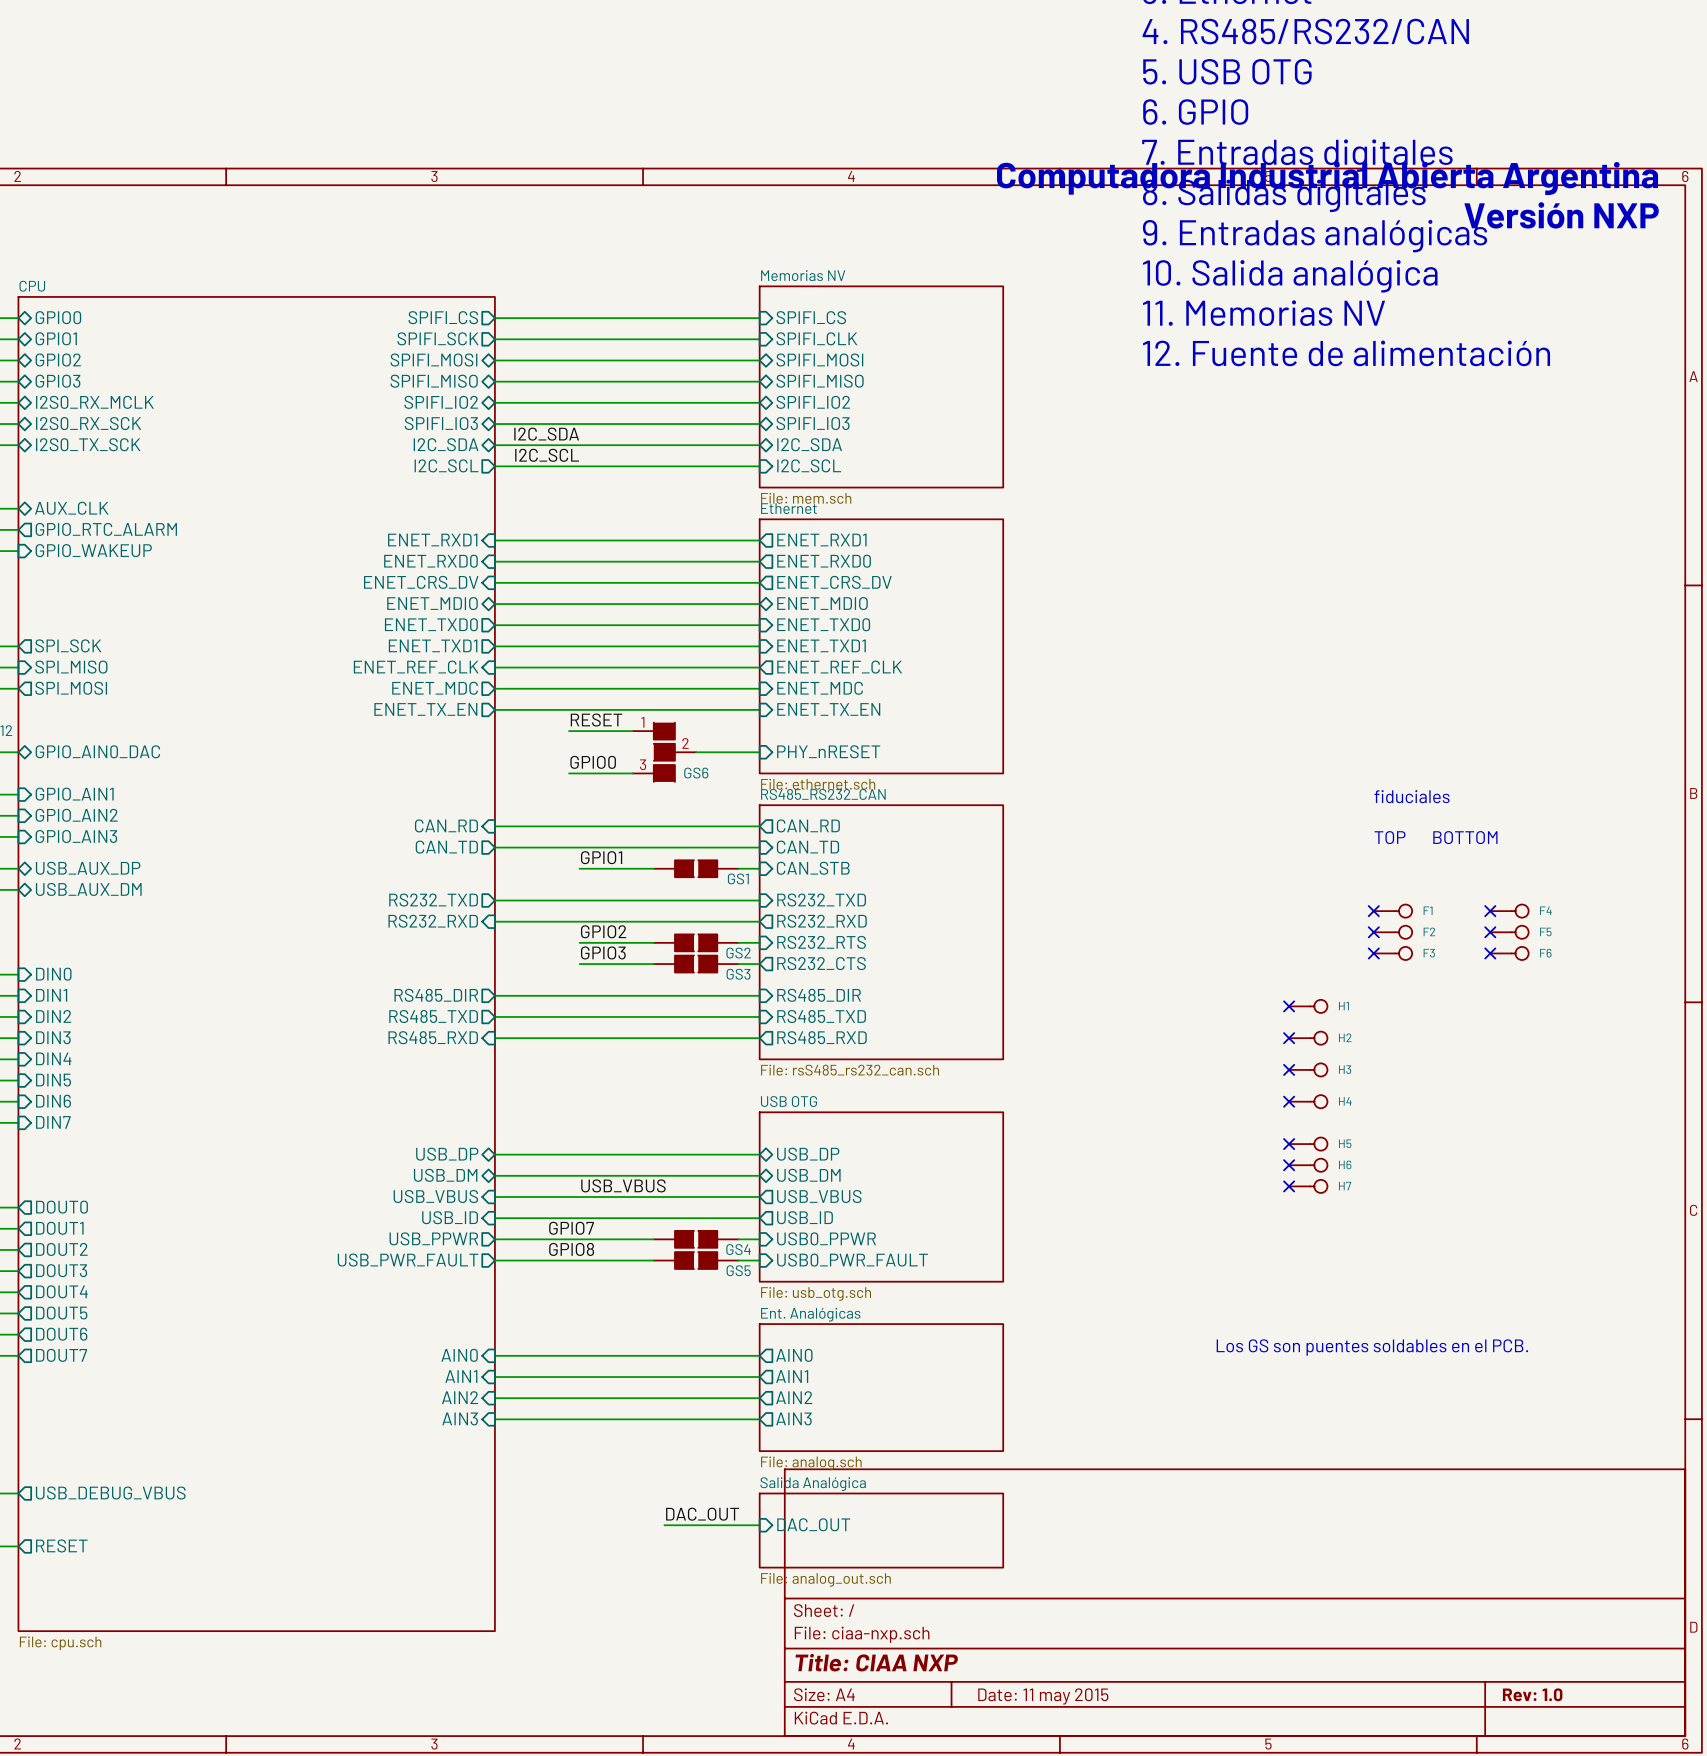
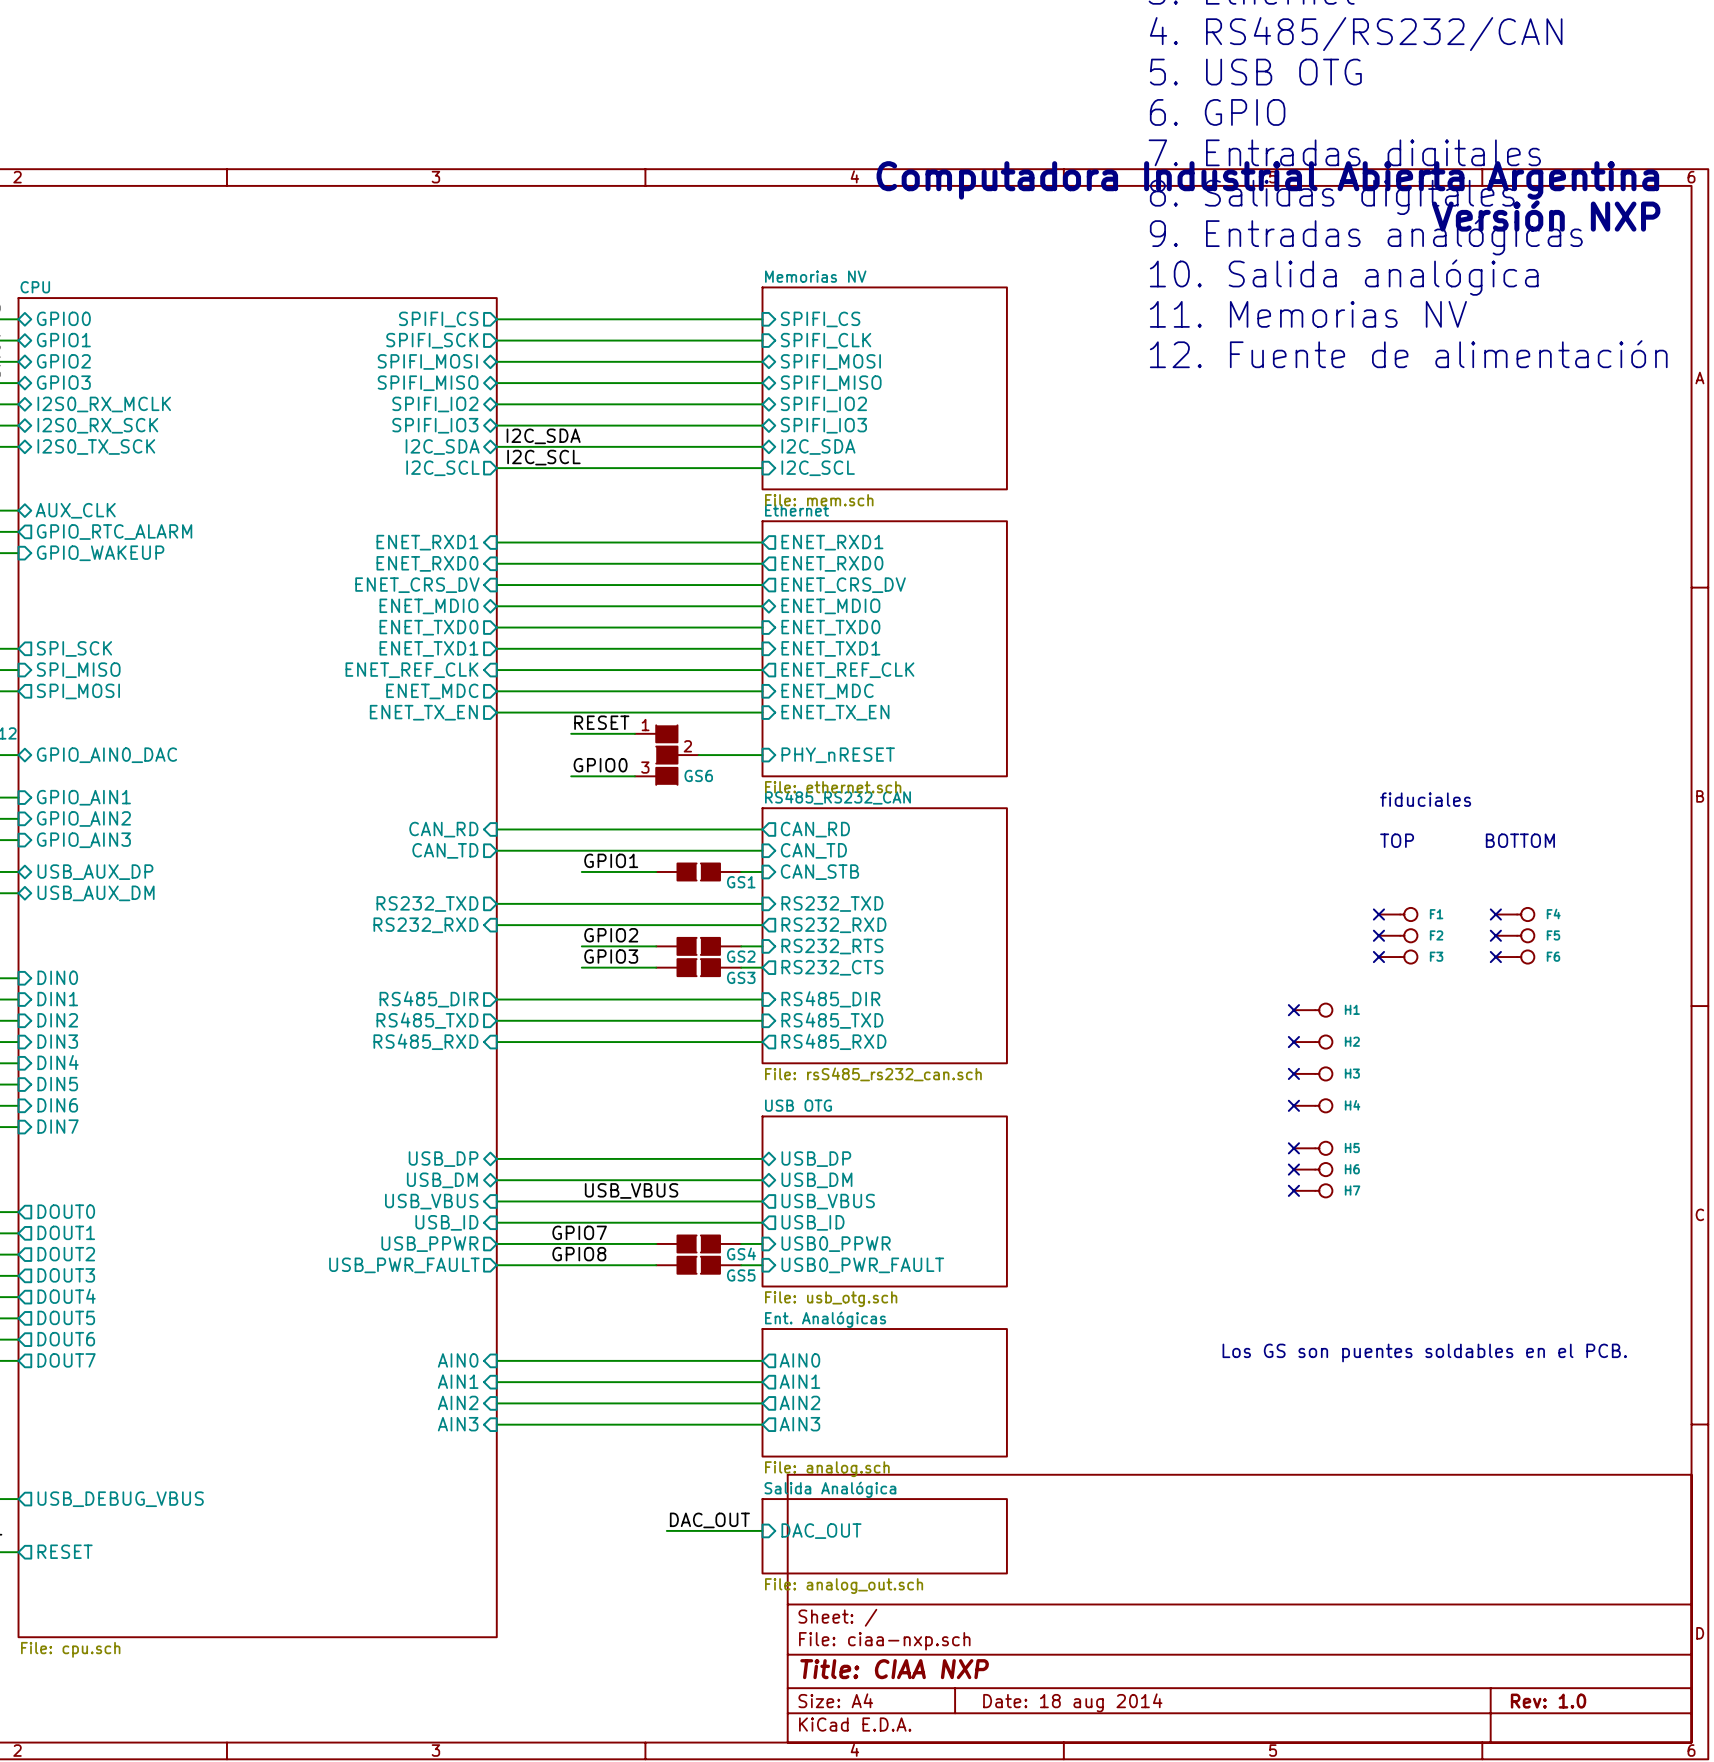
title block: Date: 11 may 2015 (1043, 1696) -> Date: 18 aug 2014 (1072, 1702)

